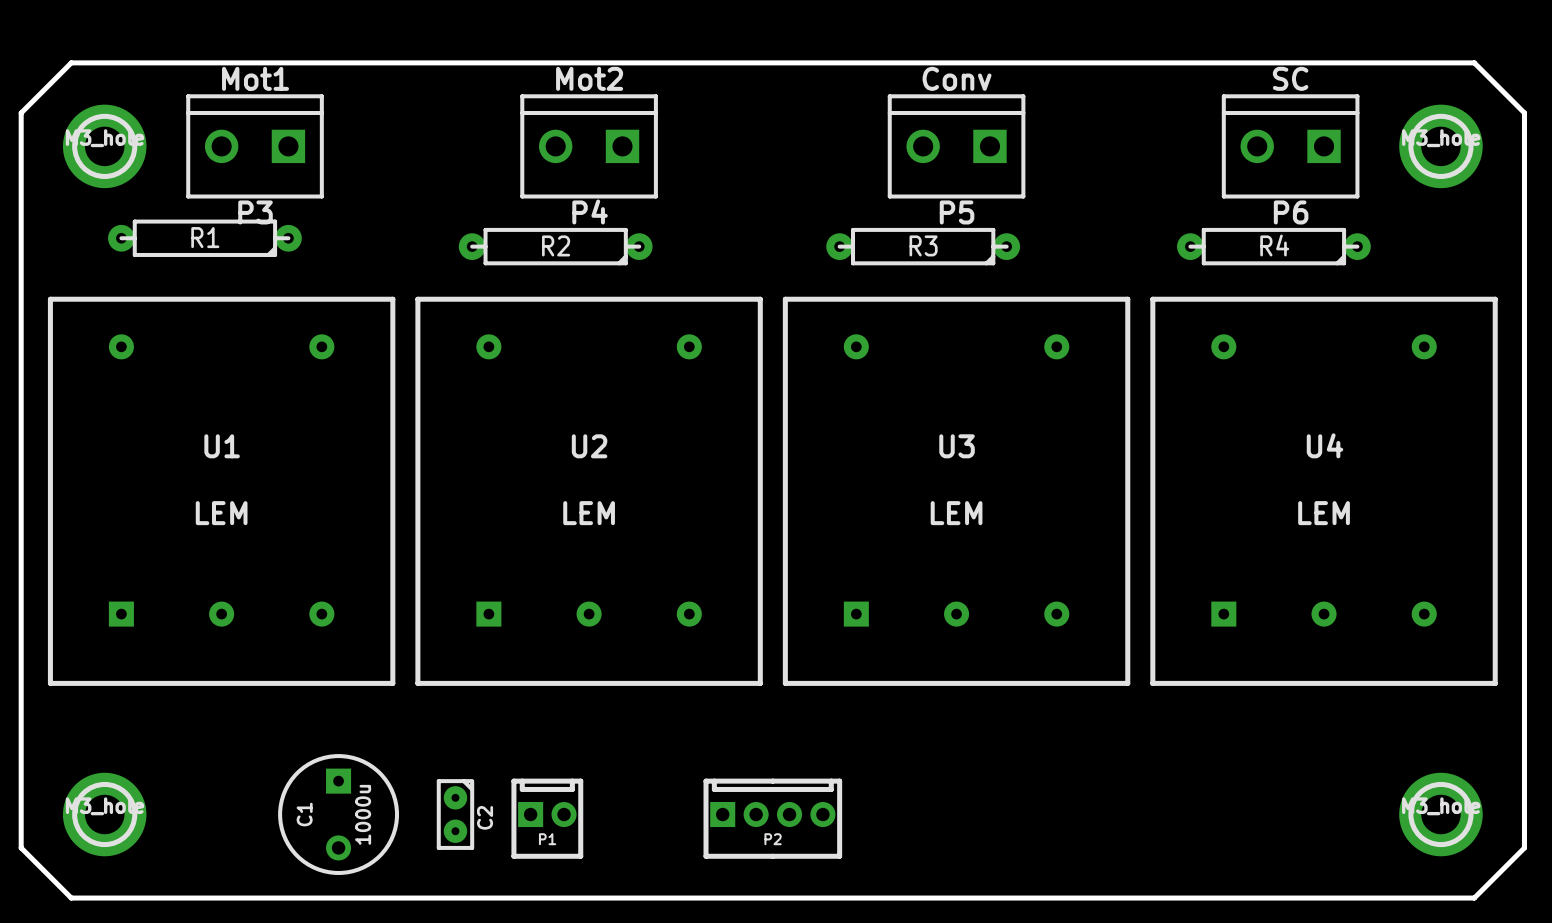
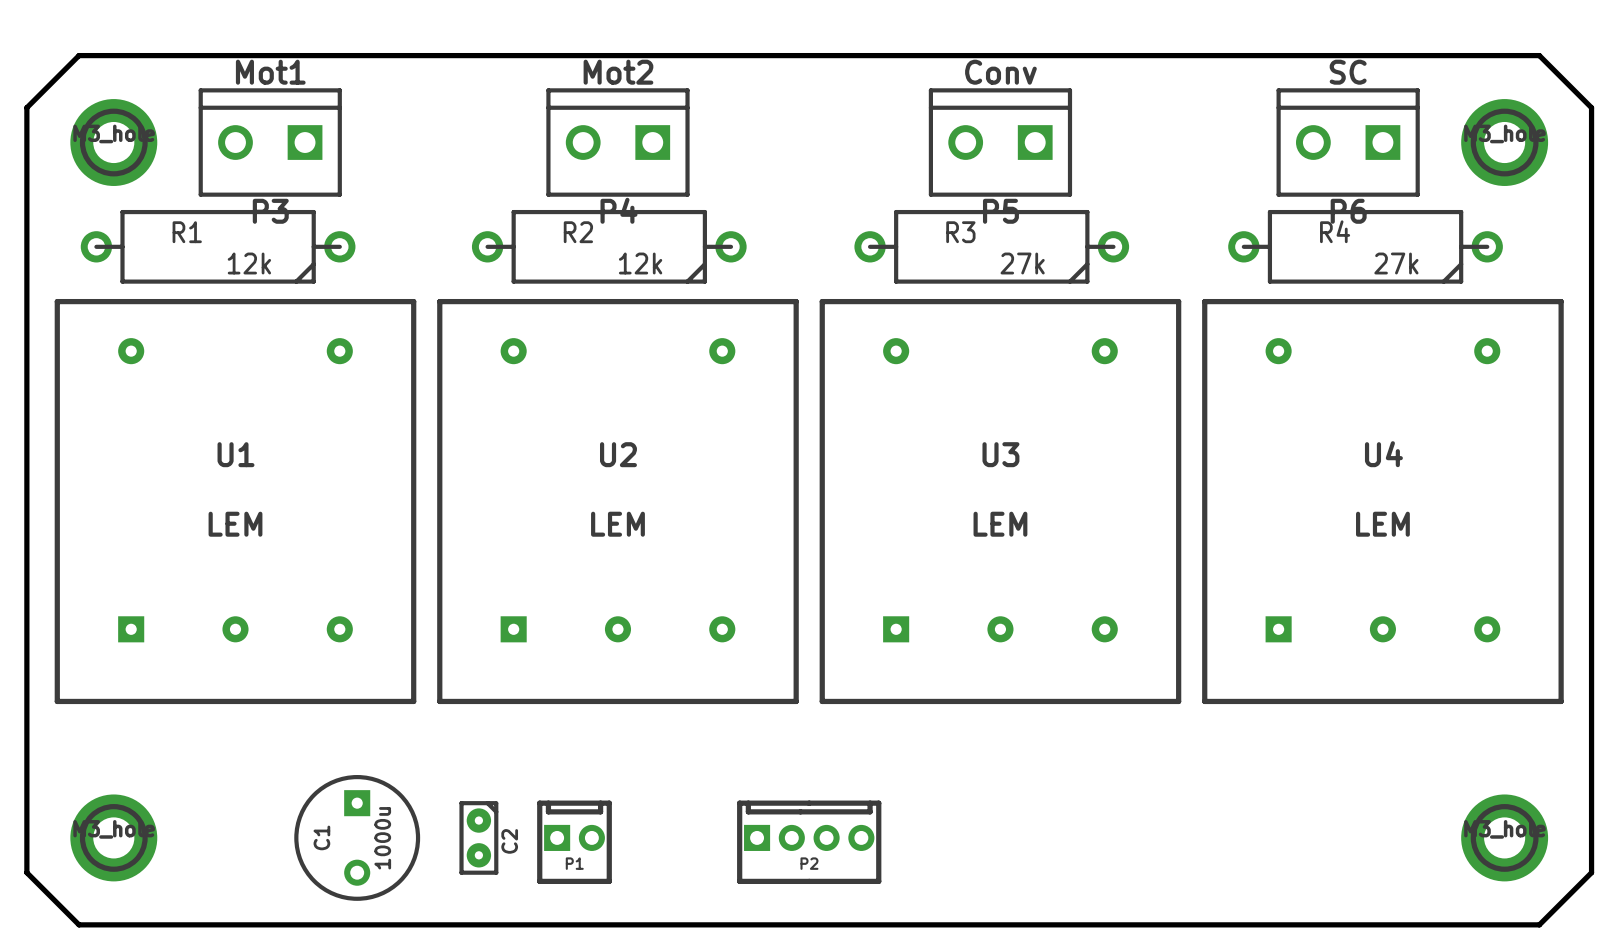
R1 footprint: [108, 219, 302, 257] -> [80, 209, 356, 284]
R2 footprint: [458, 227, 653, 266] -> [471, 209, 747, 284]
R3 footprint: [826, 227, 1021, 266] -> [854, 209, 1130, 284]
R4 footprint: [1177, 227, 1371, 266] -> [1228, 209, 1503, 284]
R1 name position: R1 (205, 237) -> R1 (187, 232)
R2 name position: R2 (556, 245) -> R2 (578, 232)
R3 name position: R3 (923, 245) -> R3 (960, 232)
R4 name position: R4 (1274, 245) -> R4 (1335, 231)
R1 value: none -> 12k (249, 263)
R2 value: none -> 12k (640, 263)
R3 value: none -> 27k (1022, 263)
R4 value: none -> 27k (1396, 263)

